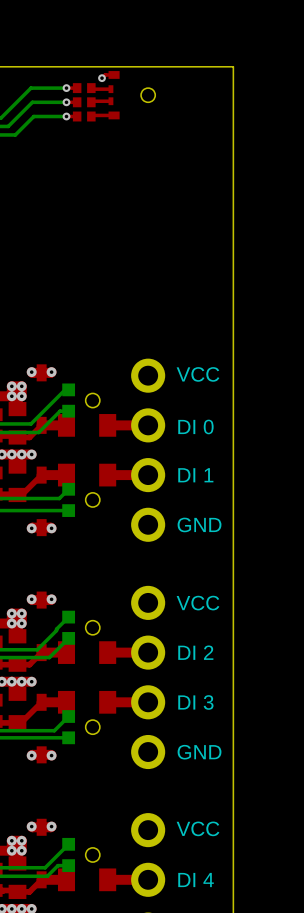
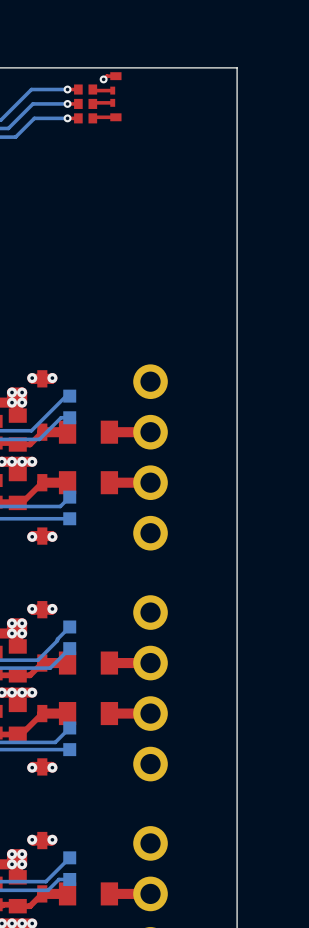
part: (131, 95) -> none
text: VCC (198, 374) -> none
part footprint: [62, 383, 100, 418] -> [63, 389, 77, 425]
text: DI 0 (195, 426) -> none
text: DI 1 (195, 475) -> none
part footprint: [62, 482, 100, 517] -> [63, 490, 77, 526]
text: GND (199, 524) -> none
text: VCC (198, 603) -> none
part footprint: [62, 610, 100, 645] -> [63, 620, 77, 656]
text: DI 2 (195, 652) -> none
text: DI 3 (195, 702) -> none
part footprint: [62, 710, 100, 745] -> [63, 721, 77, 757]
text: GND (199, 752) -> none
text: VCC (198, 828) -> none
part footprint: [62, 837, 100, 873] -> [63, 851, 77, 886]
text: DI 4 (196, 880) -> none

